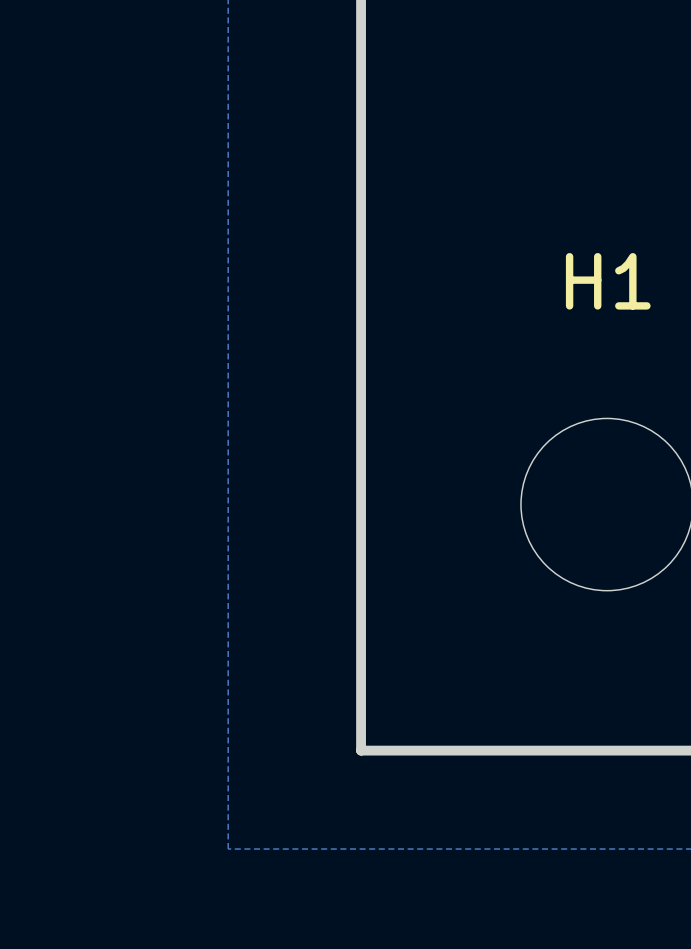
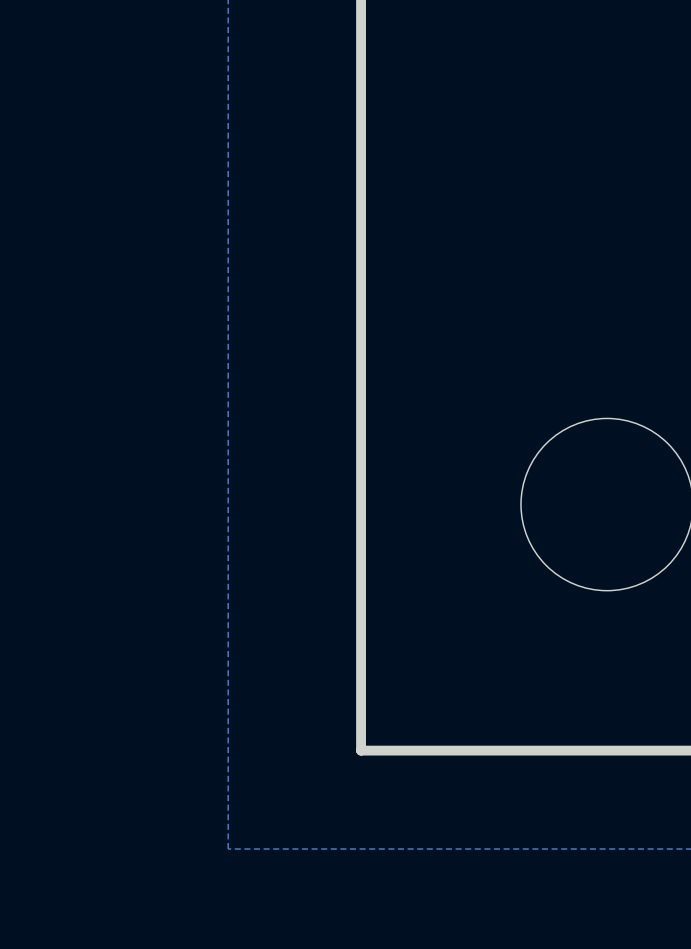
H1 name: H1 (608, 281) -> none

